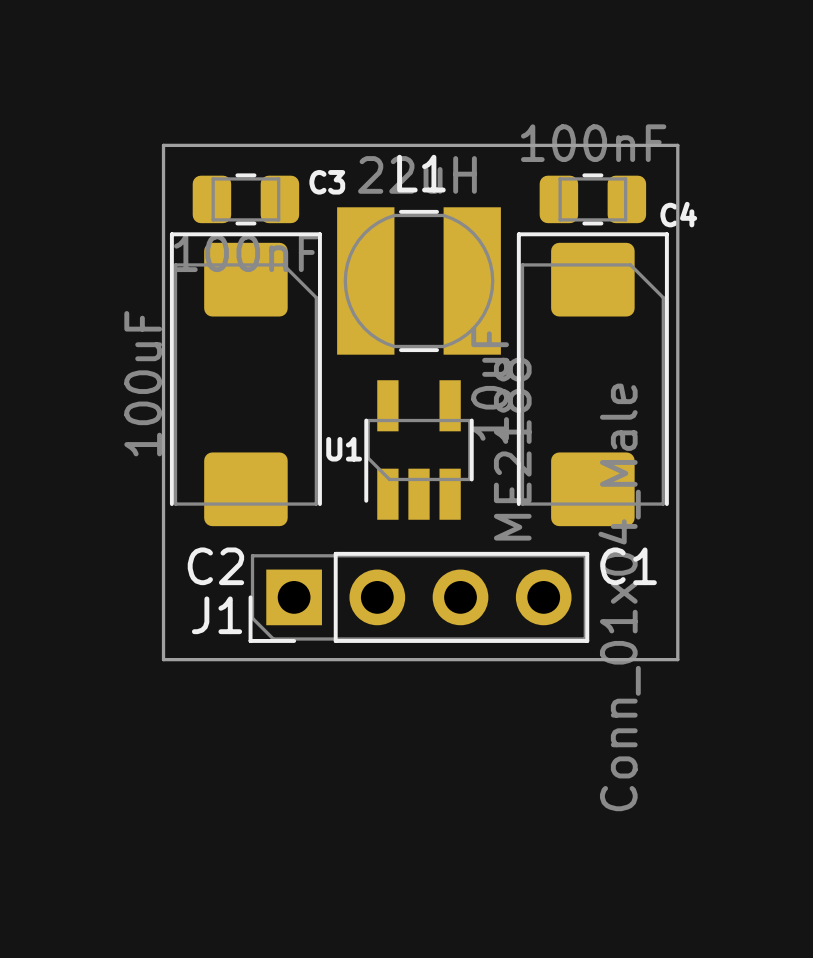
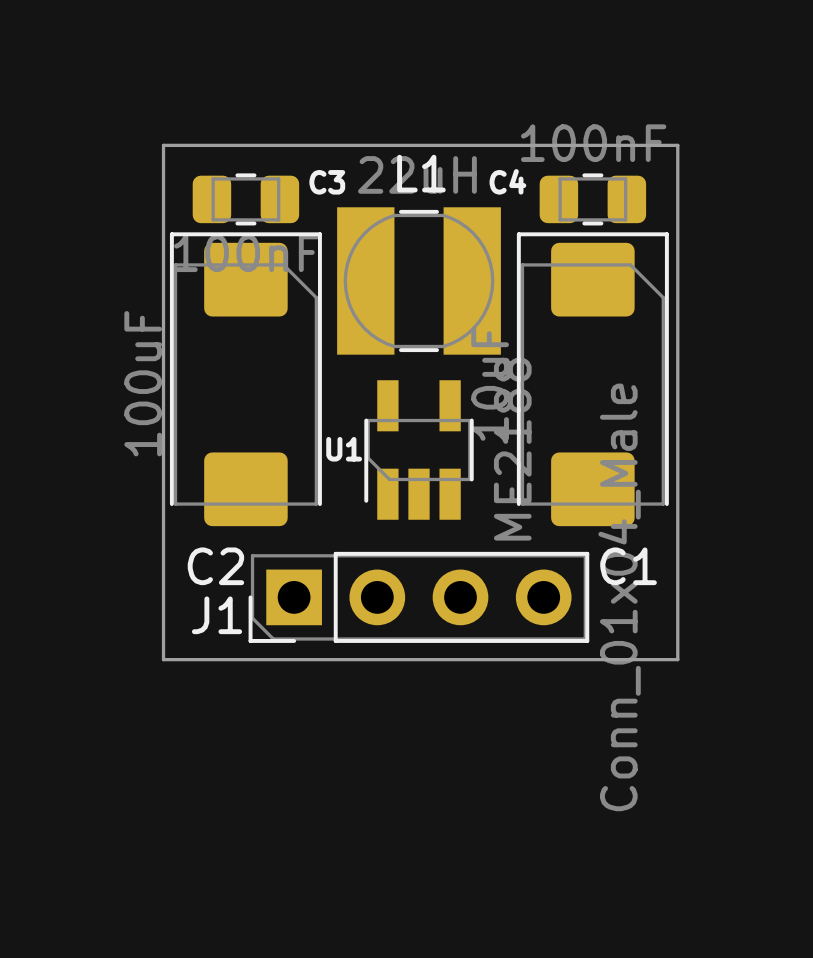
C4 name position: C4 (678, 214) -> C4 (507, 181)

